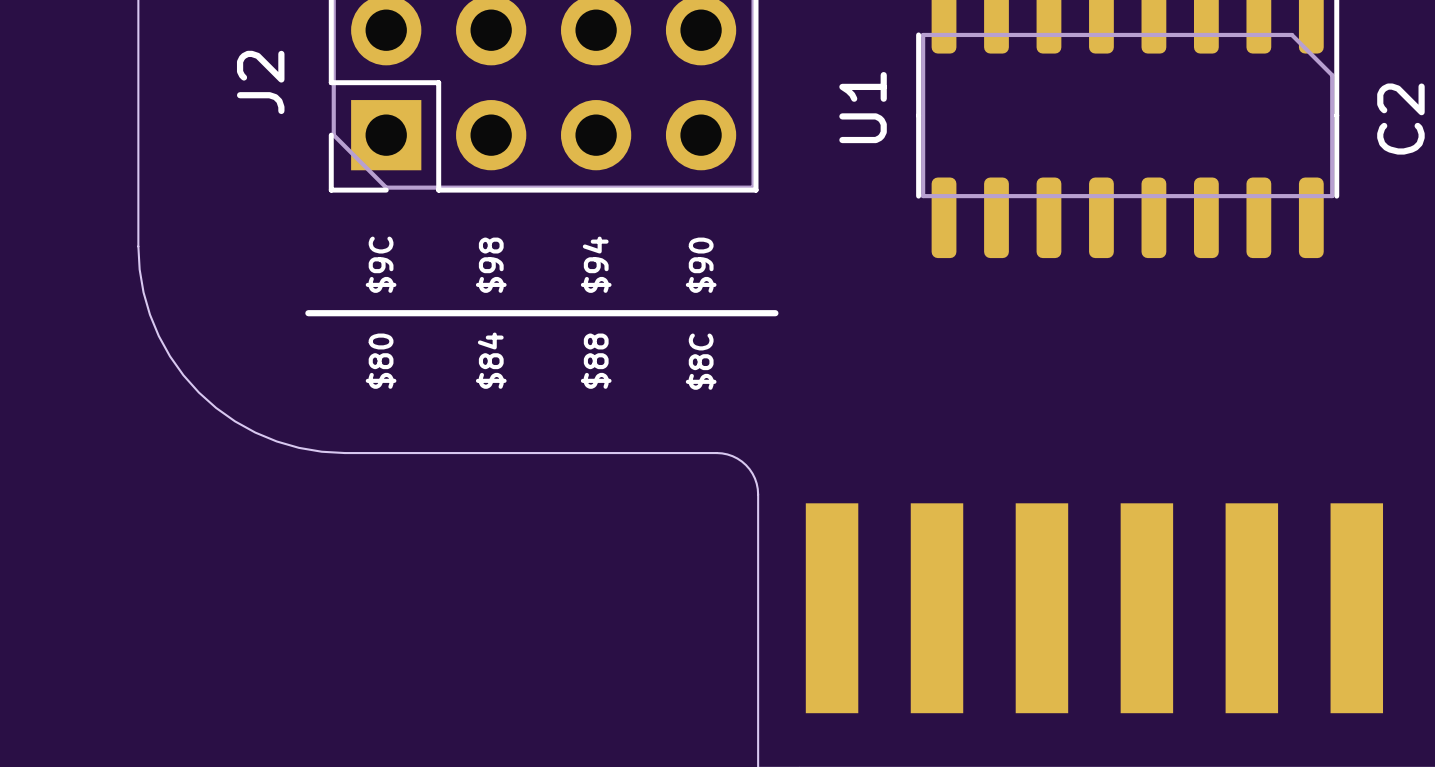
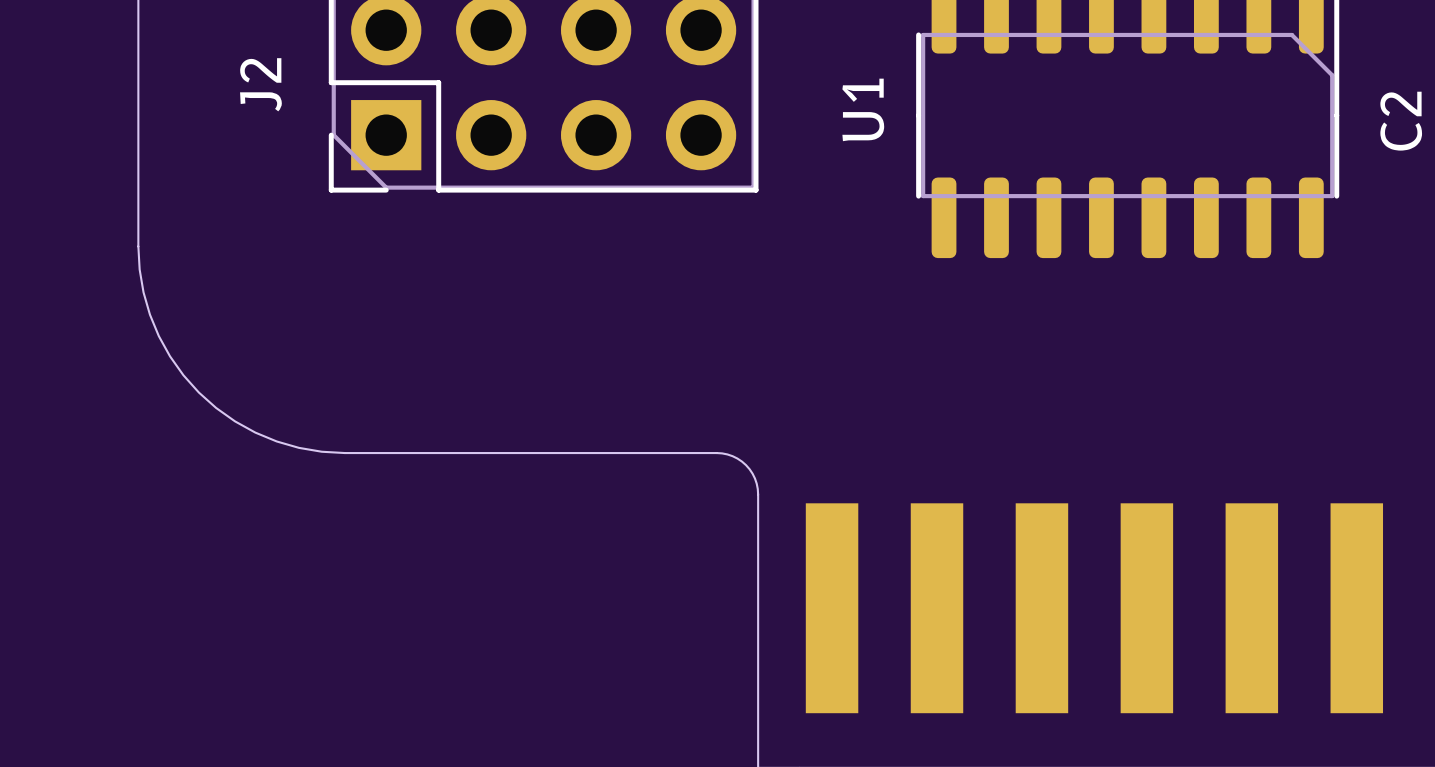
text: $9C (381, 264) -> none
text: $94 (596, 264) -> none
text: $98 (491, 265) -> none
text: $90 (701, 265) -> none
line: (308, 313) (775, 313) -> none
text: $84 (491, 360) -> none
text: $80 (381, 361) -> none
text: $88 (596, 361) -> none
text: $8C (701, 361) -> none

